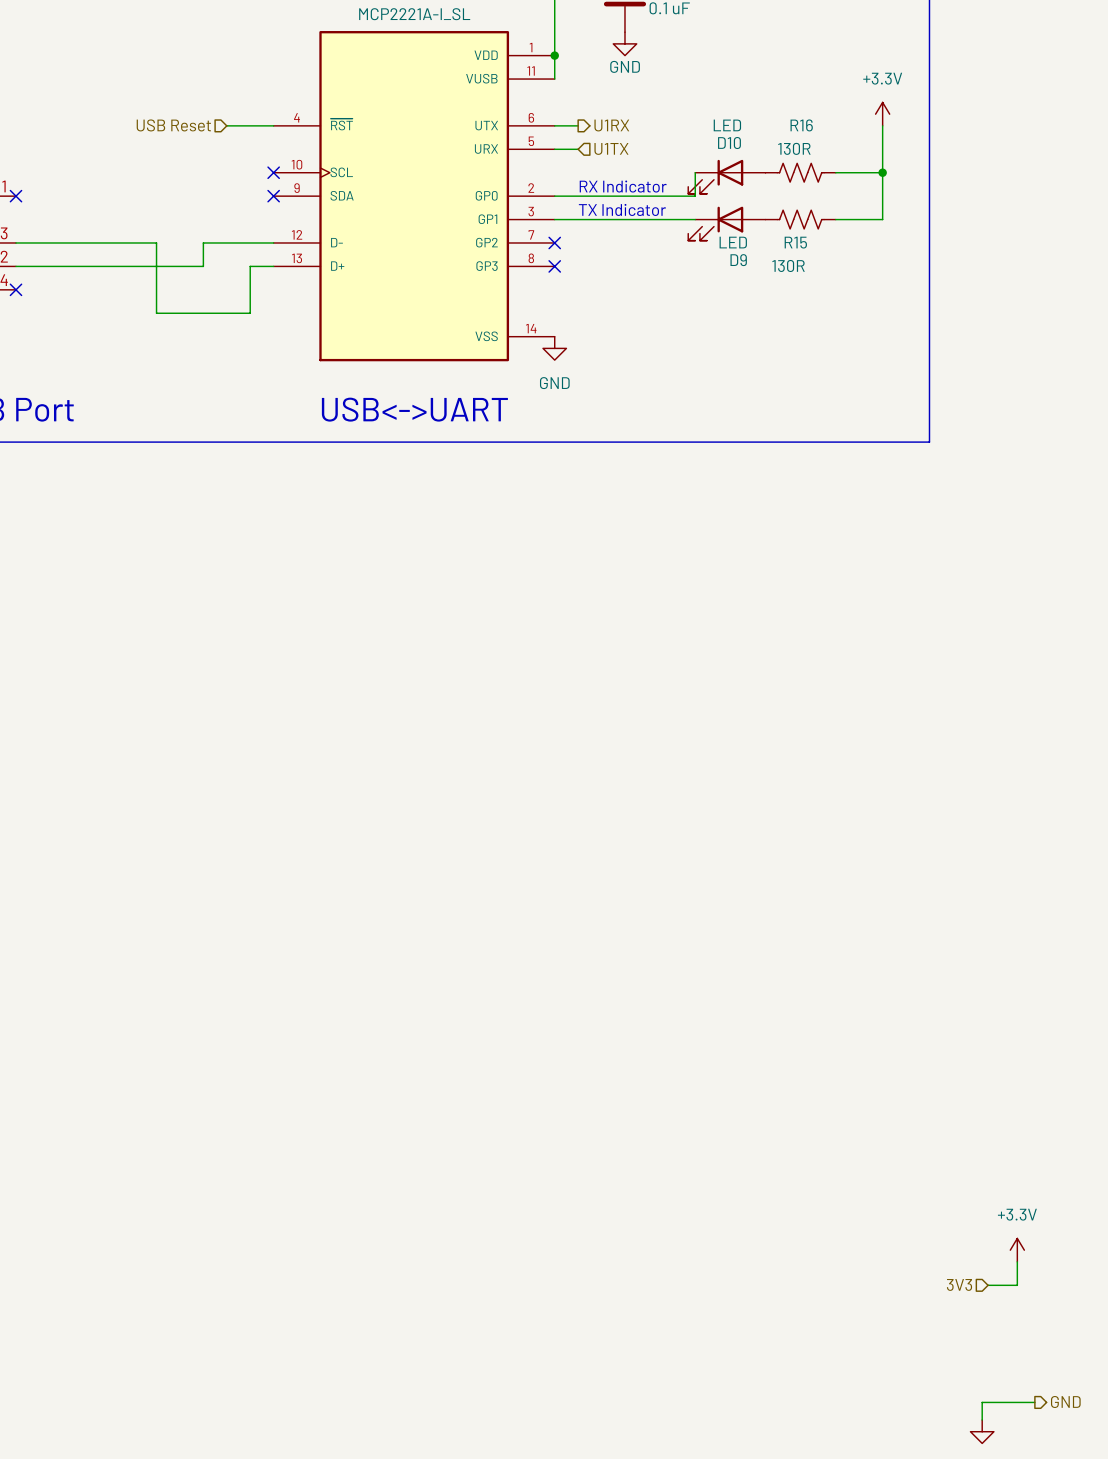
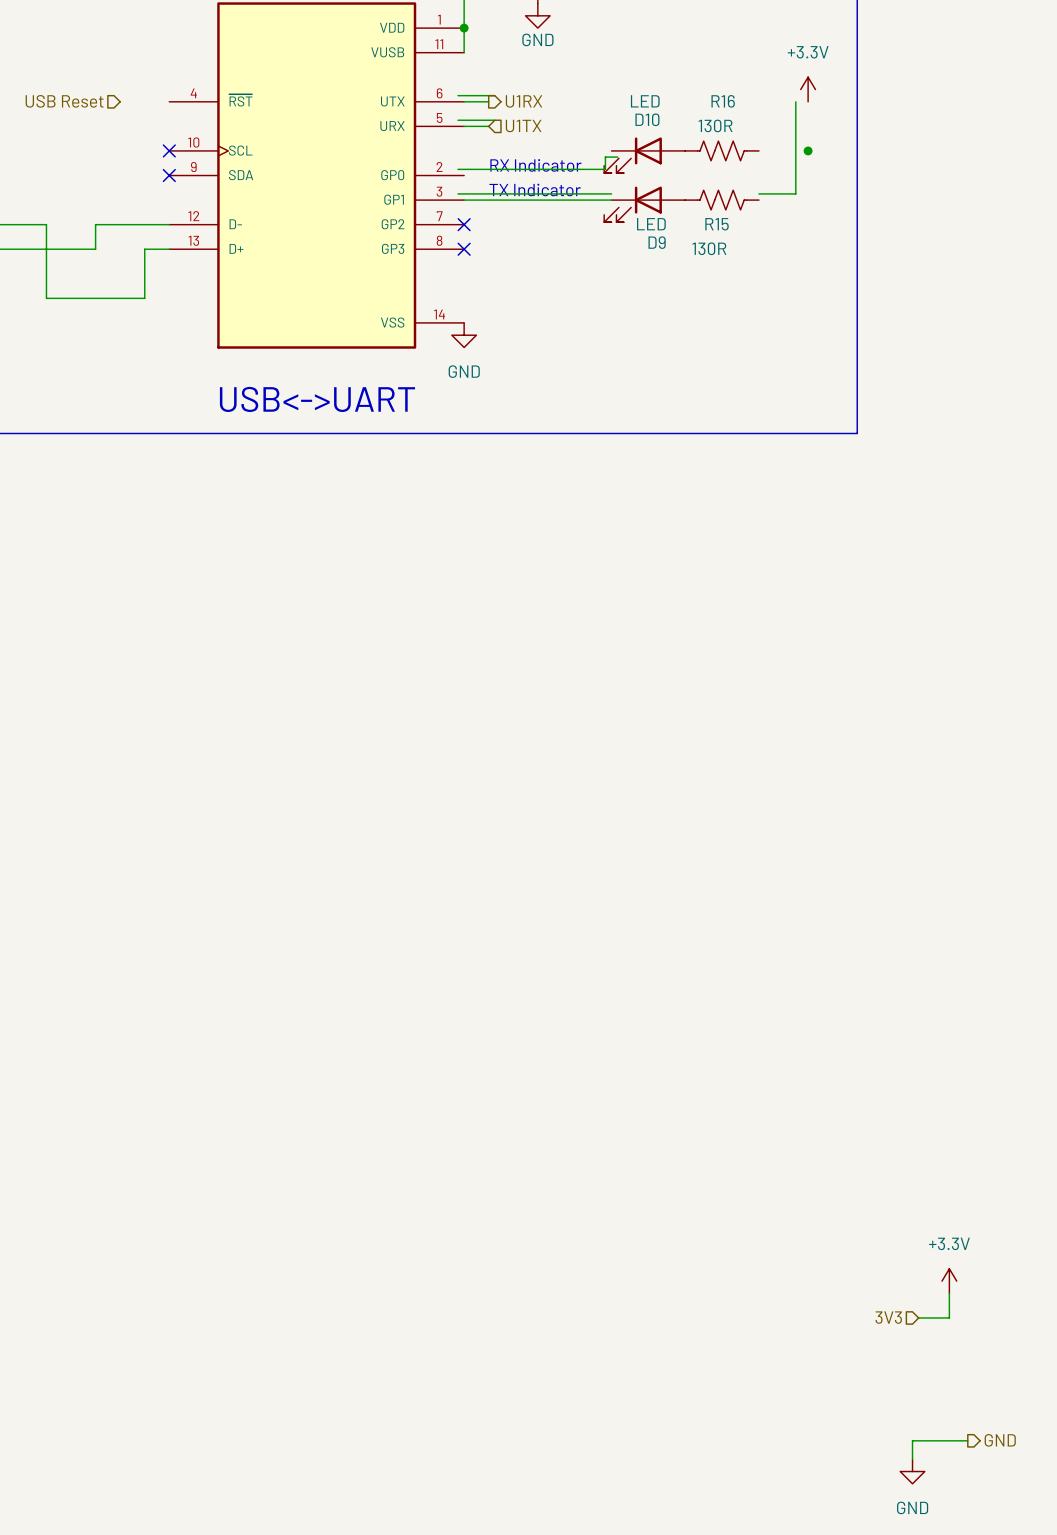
wire: none -> (457, 95) (494, 95)
wire: (226, 125) (273, 125) -> none
wire: none -> (795, 101) (795, 193) (758, 193)
wire: (882, 125) (882, 219) (835, 219) -> none
wire: none -> (457, 120) (494, 120)
wire: (695, 172) (695, 196) (554, 196) -> none
wire: (835, 172) (882, 172) -> none
wire: none -> (617, 157) (605, 157) (605, 169) (457, 169)
wire: none -> (457, 193) (611, 193)

